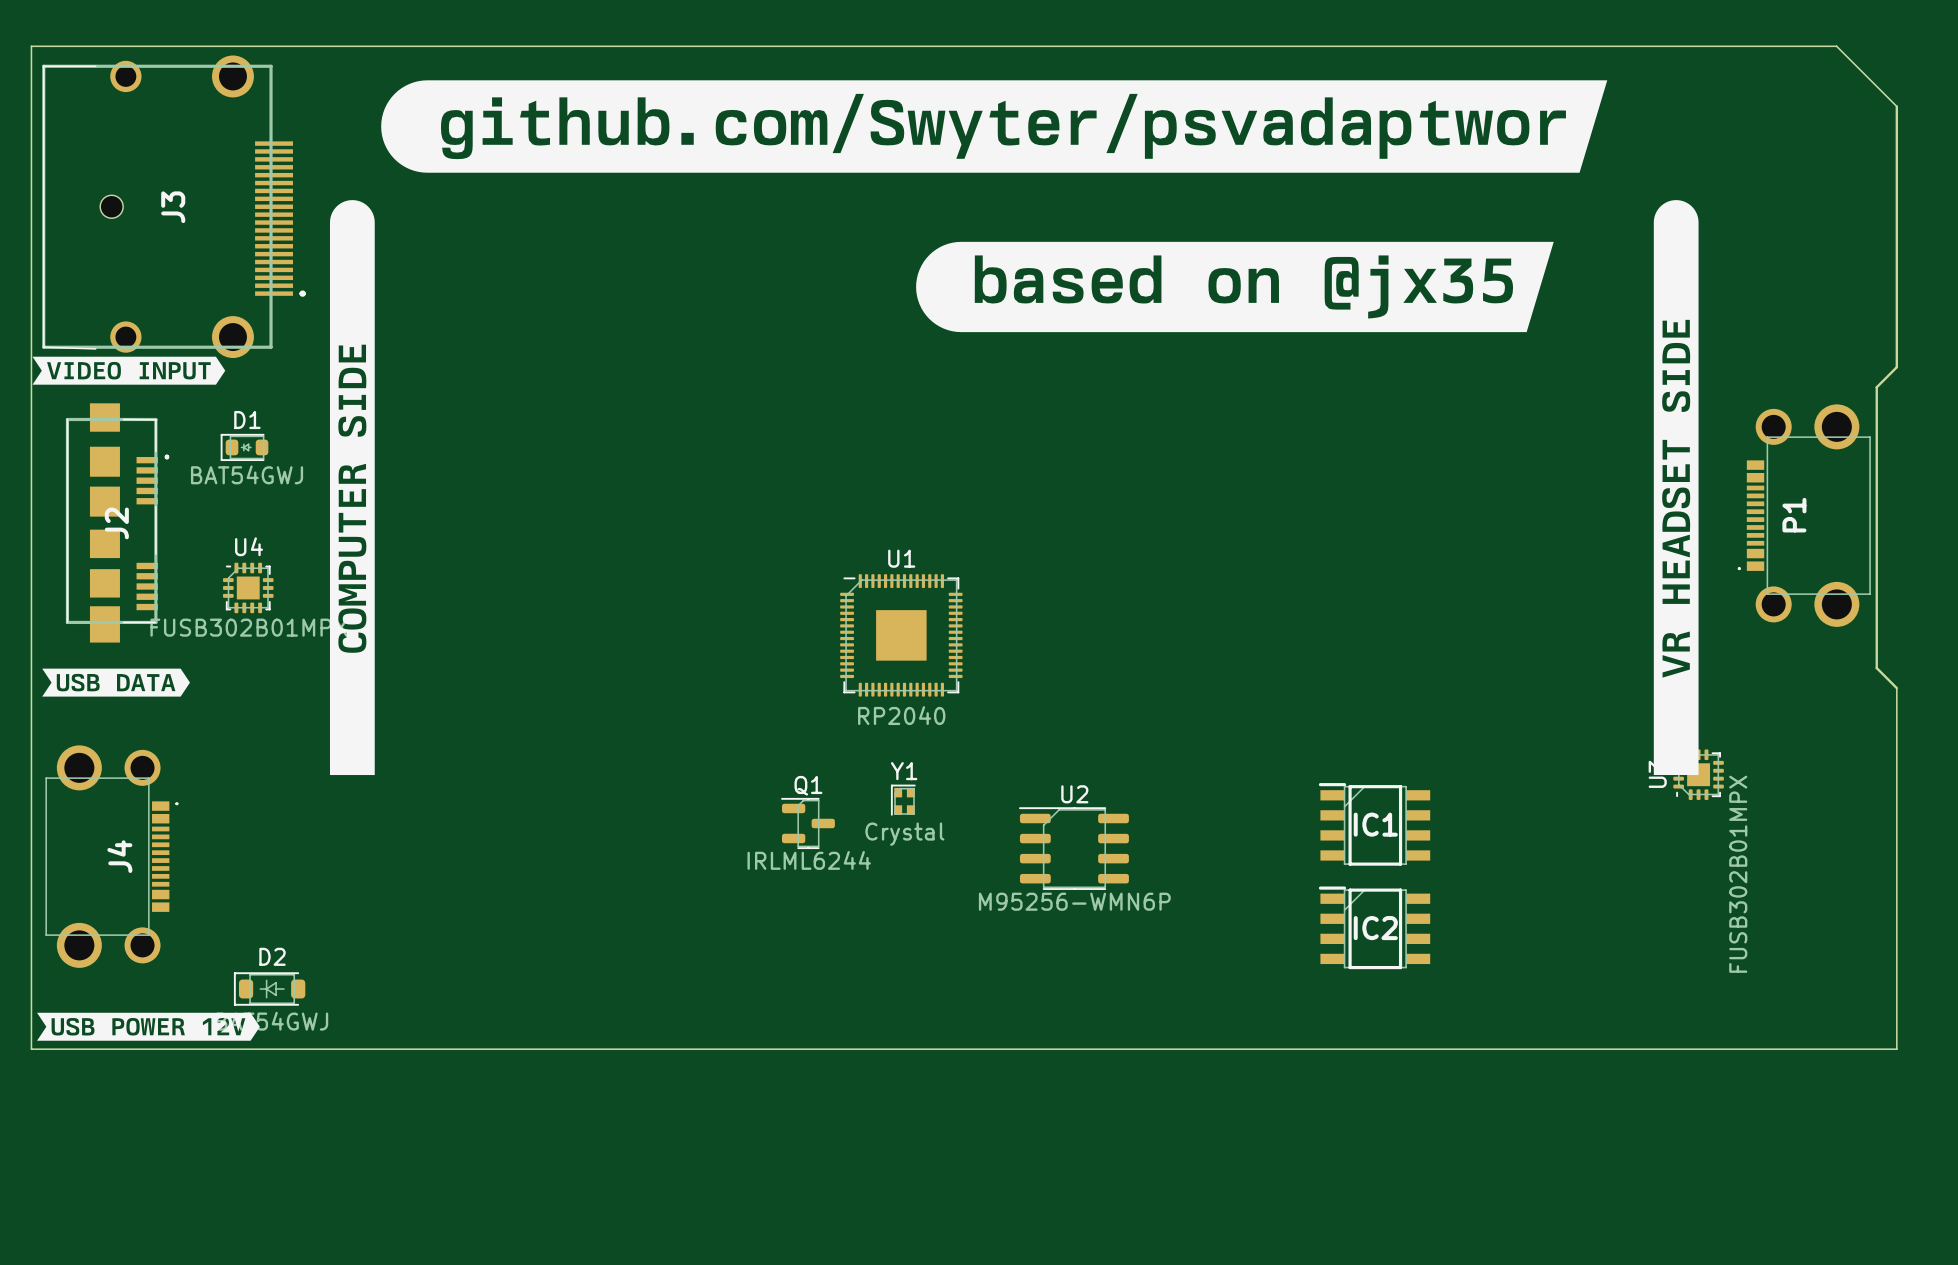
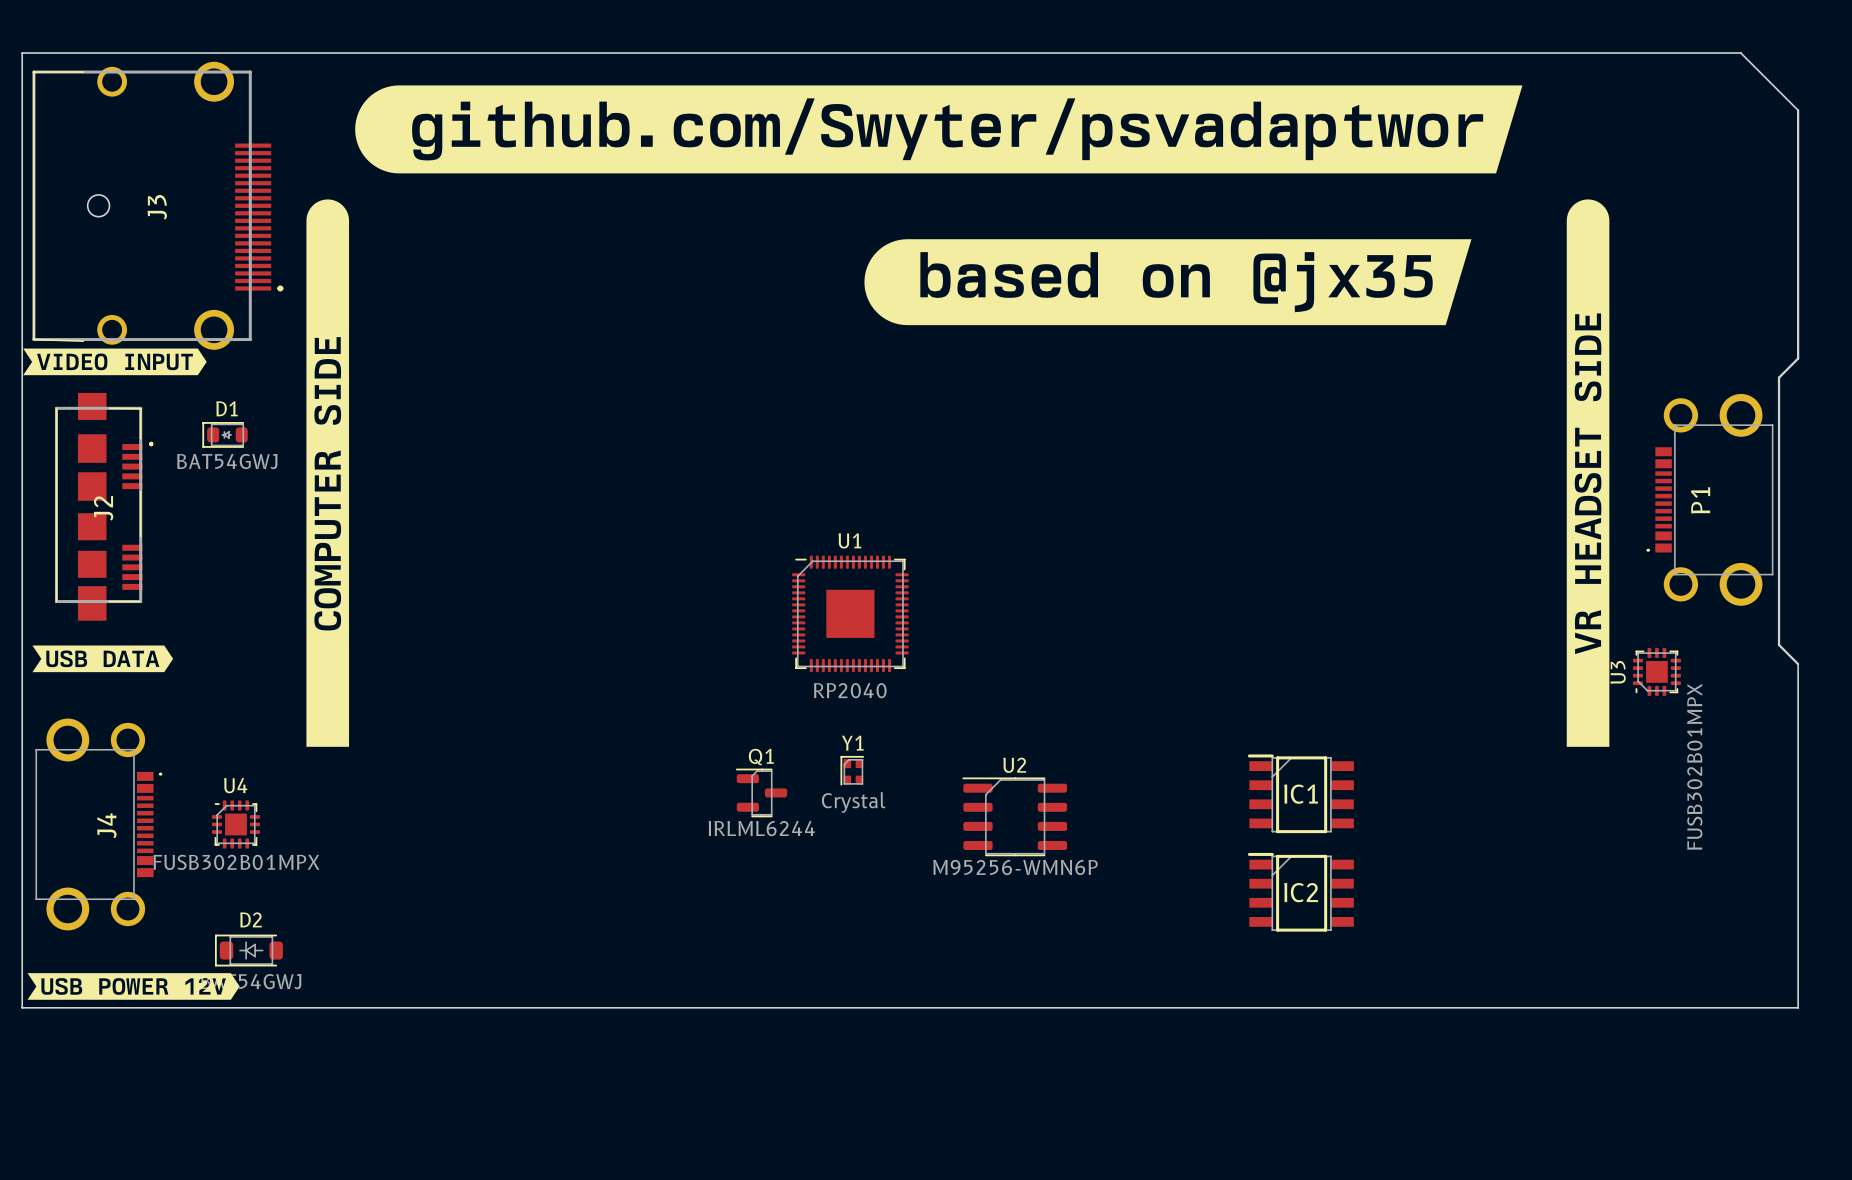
U4 position: (248, 587) -> (235, 824)
U3 position: (1698, 774) -> (1656, 671)

